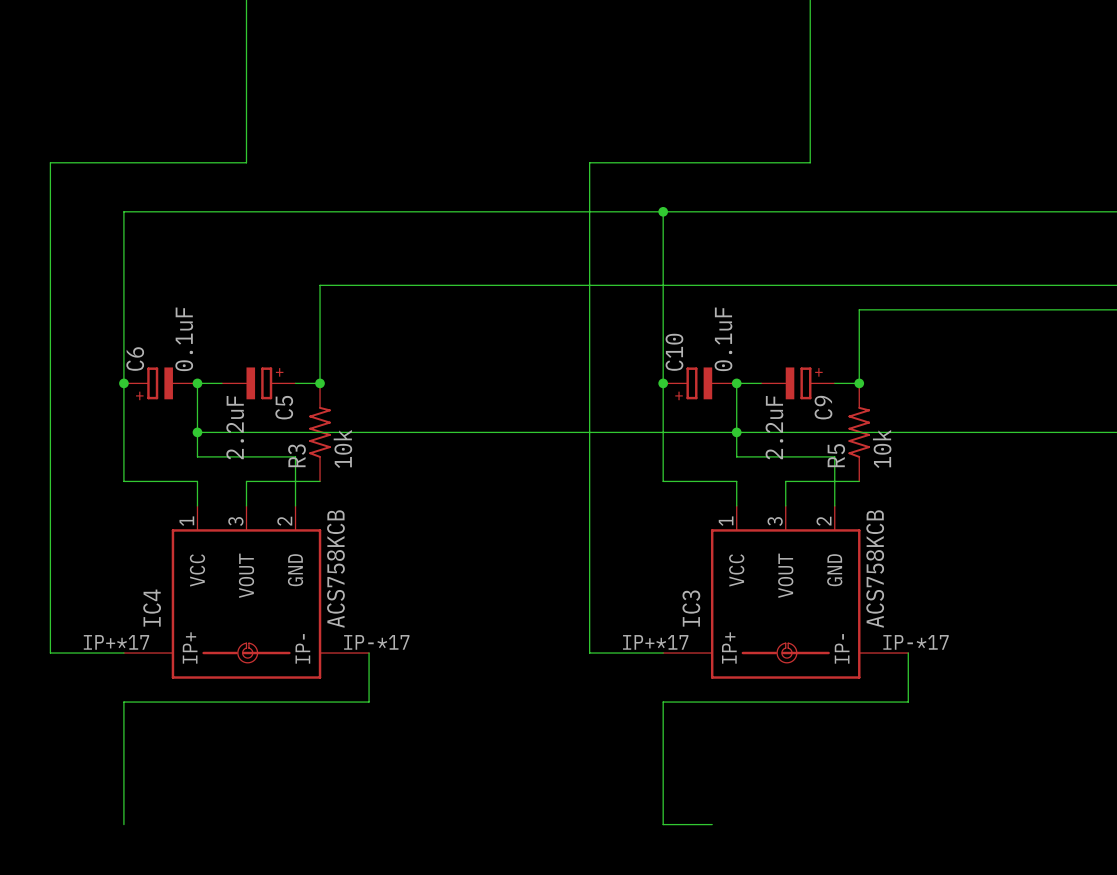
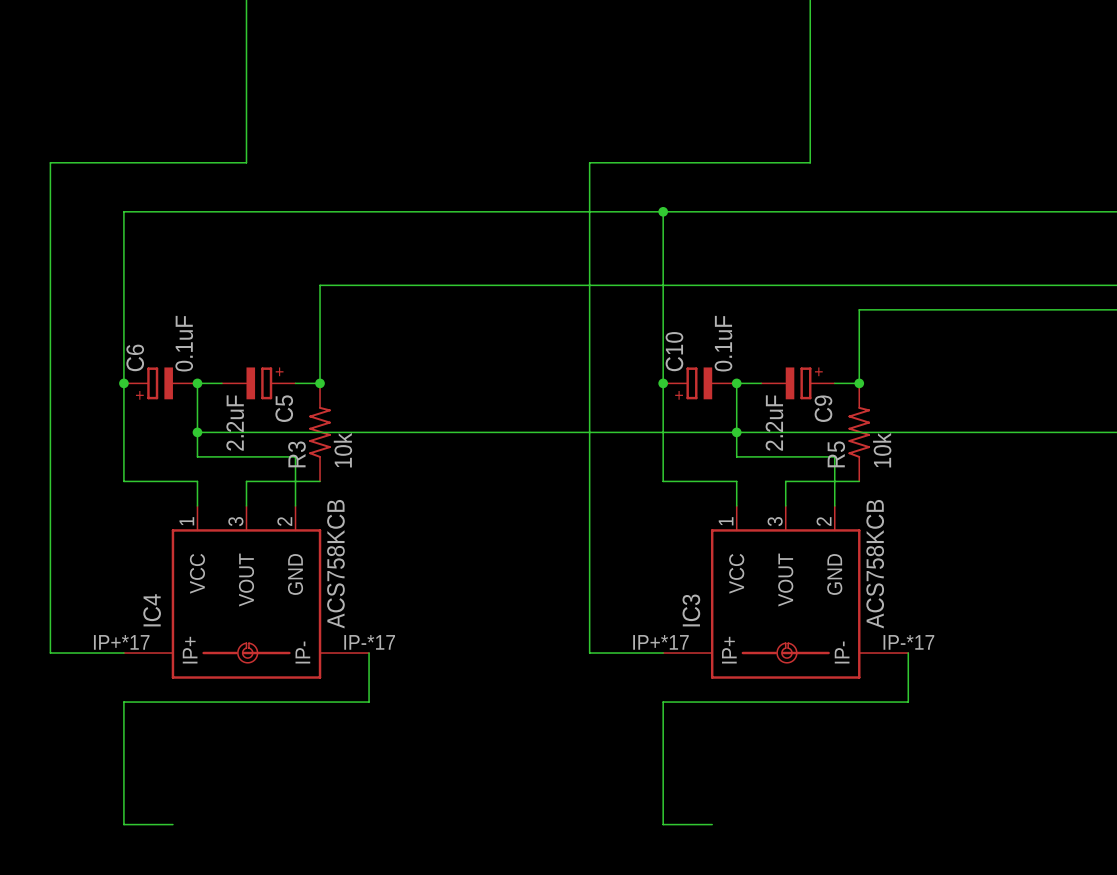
wire: none -> (123, 824) (172, 824)

